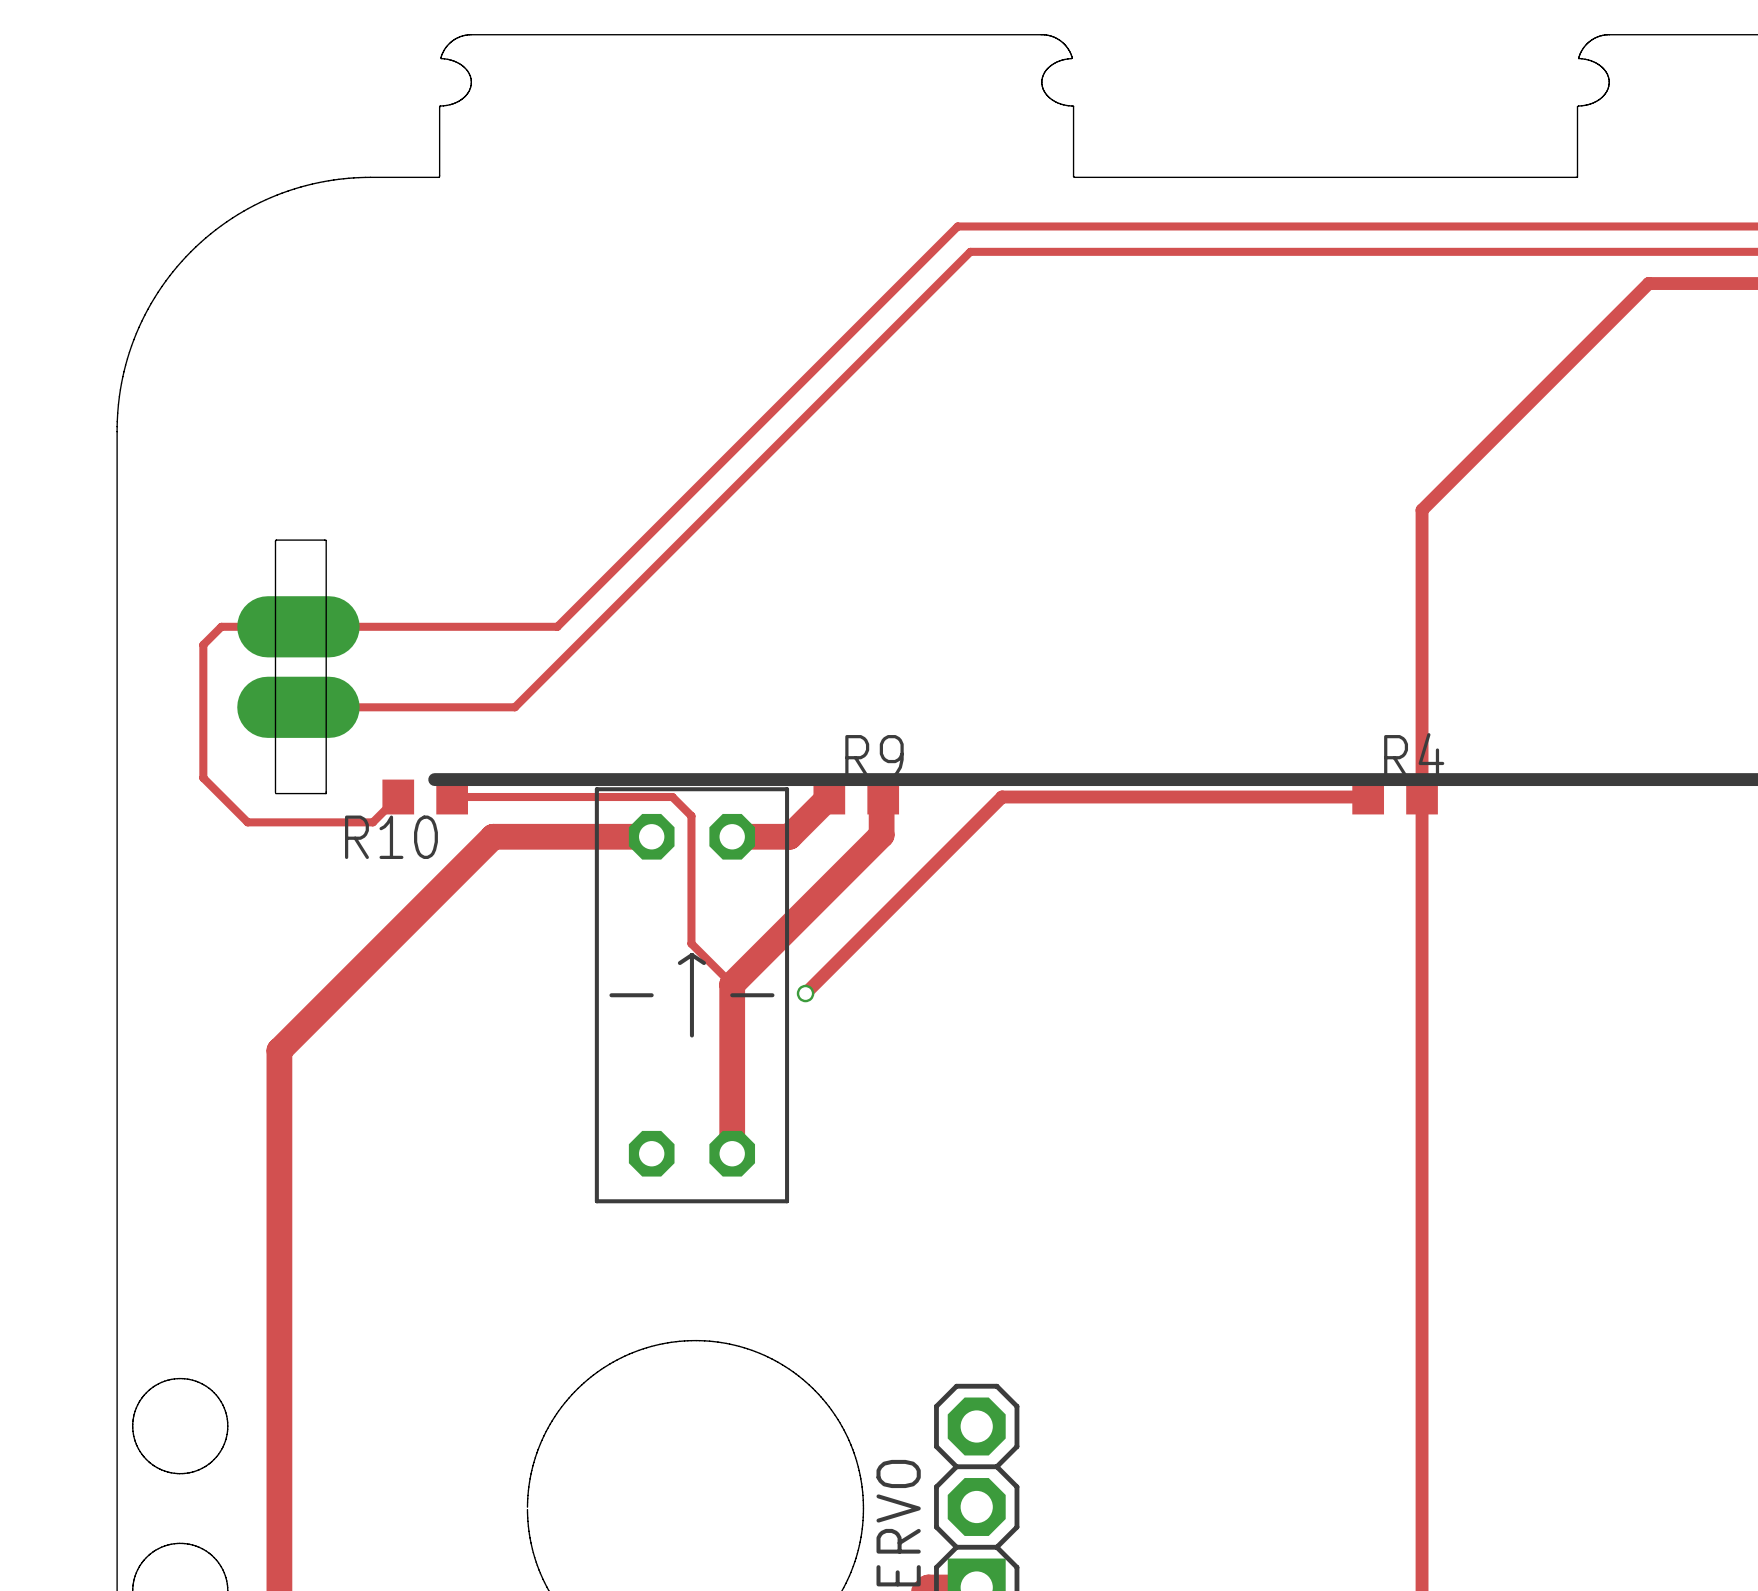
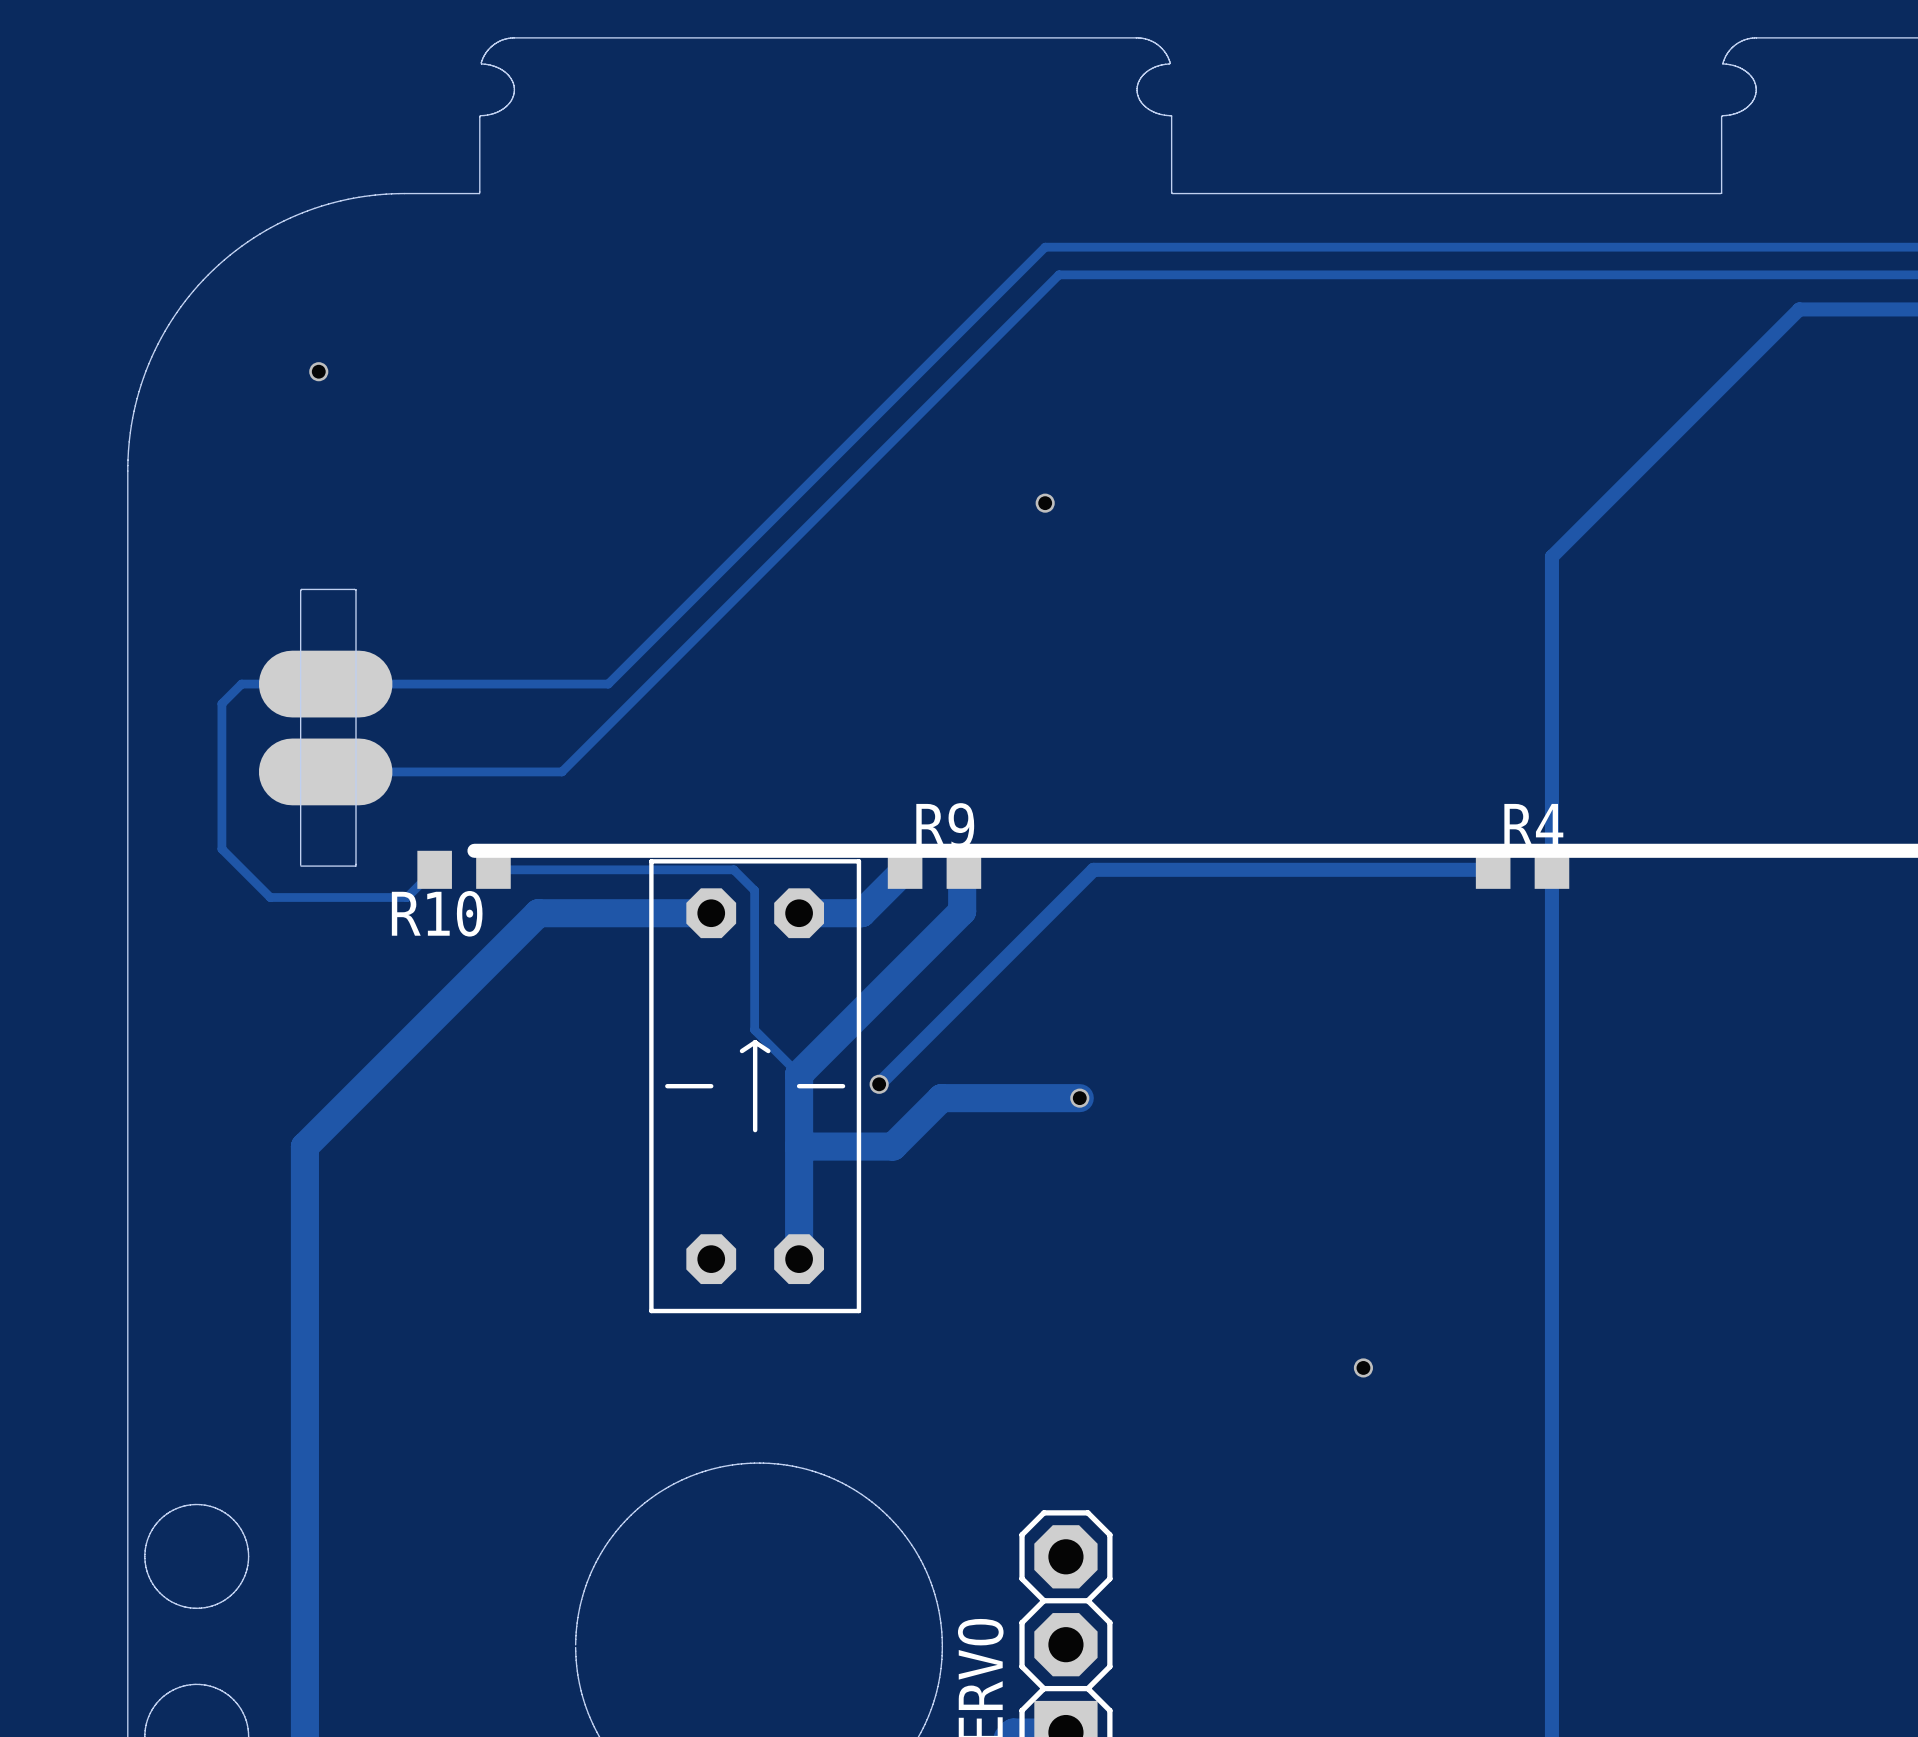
via: none -> (318, 371)
via: none -> (1045, 503)
track: none -> (1079, 1098) (941, 1098) (892, 1146) (799, 1146)
via: none -> (1079, 1098)
via: none -> (1363, 1367)

